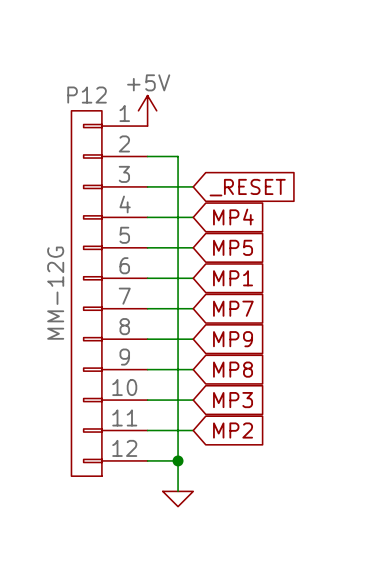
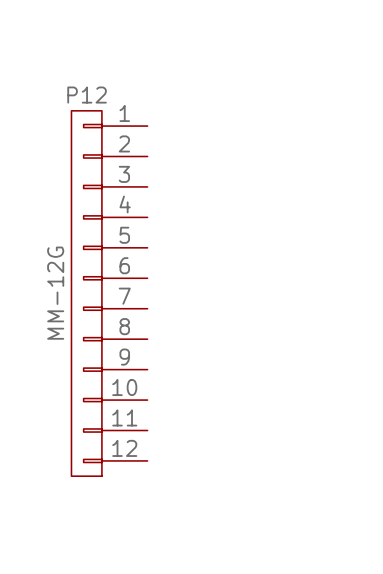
power symbol: +5V (147, 110) -> none
wire: (147, 156) (178, 156) (178, 491) -> none
wire: (147, 186) (193, 186) -> none
global label: _RESET (247, 187) -> none
wire: (147, 217) (193, 217) -> none
global label: MP4 (233, 217) -> none
wire: (147, 247) (193, 247) -> none
global label: MP5 (233, 247) -> none
wire: (147, 278) (193, 278) -> none
global label: MP1 (233, 278) -> none
wire: (147, 308) (193, 308) -> none
global label: MP7 (233, 308) -> none
wire: (147, 339) (193, 339) -> none
global label: MP9 (233, 339) -> none
wire: (147, 369) (193, 369) -> none
global label: MP8 (233, 369) -> none
wire: (147, 400) (193, 400) -> none
global label: MP3 (233, 400) -> none
wire: (147, 430) (193, 430) -> none
global label: MP2 (233, 430) -> none
wire: (147, 460) (178, 460) -> none
junction: (178, 460) -> none
power symbol: (178, 499) -> none

